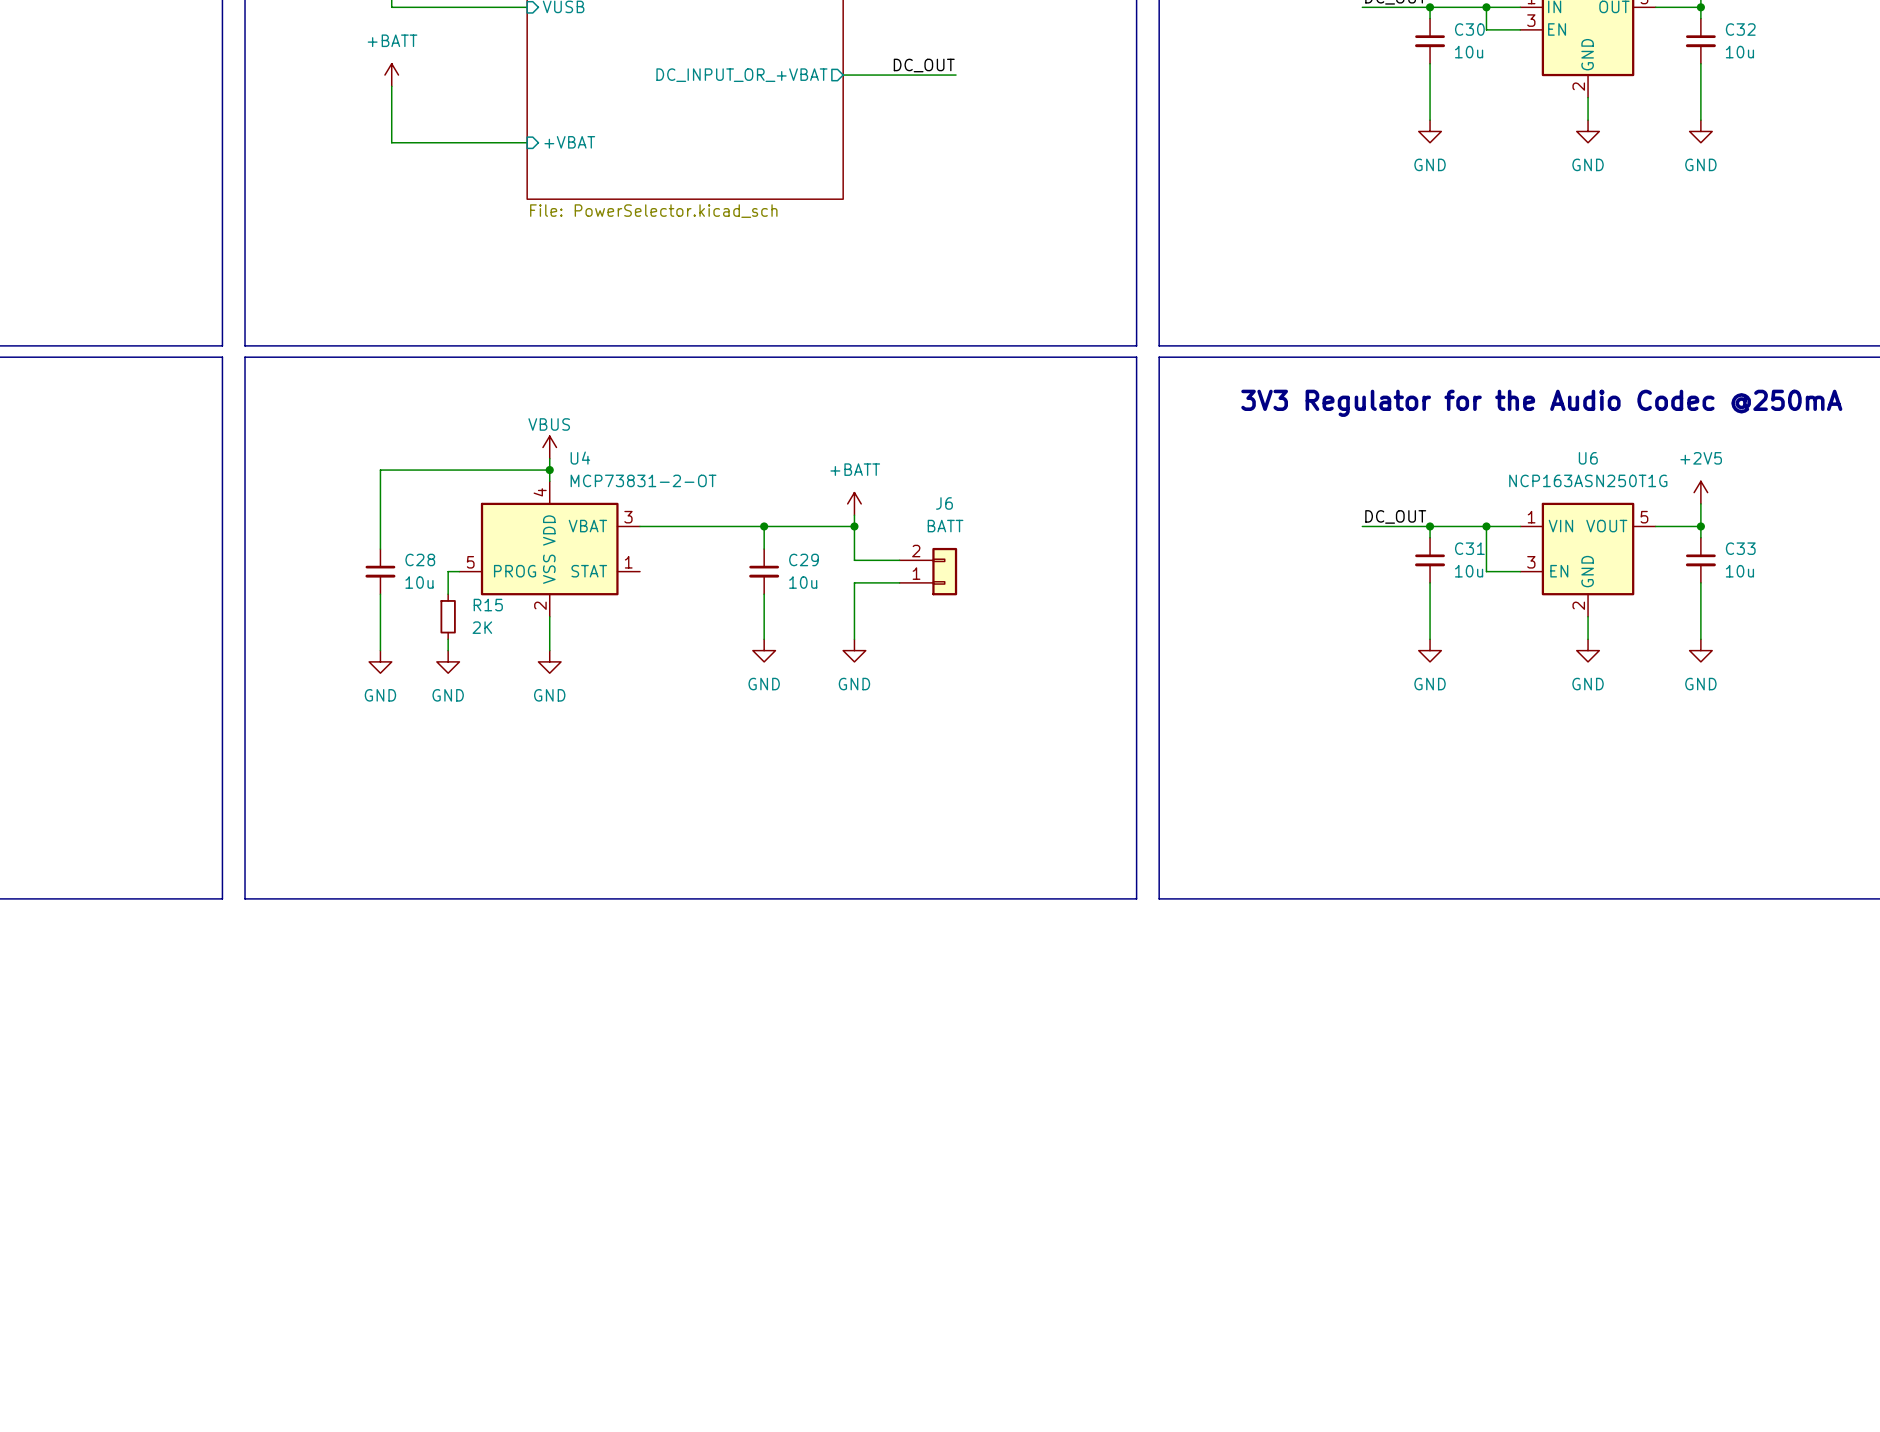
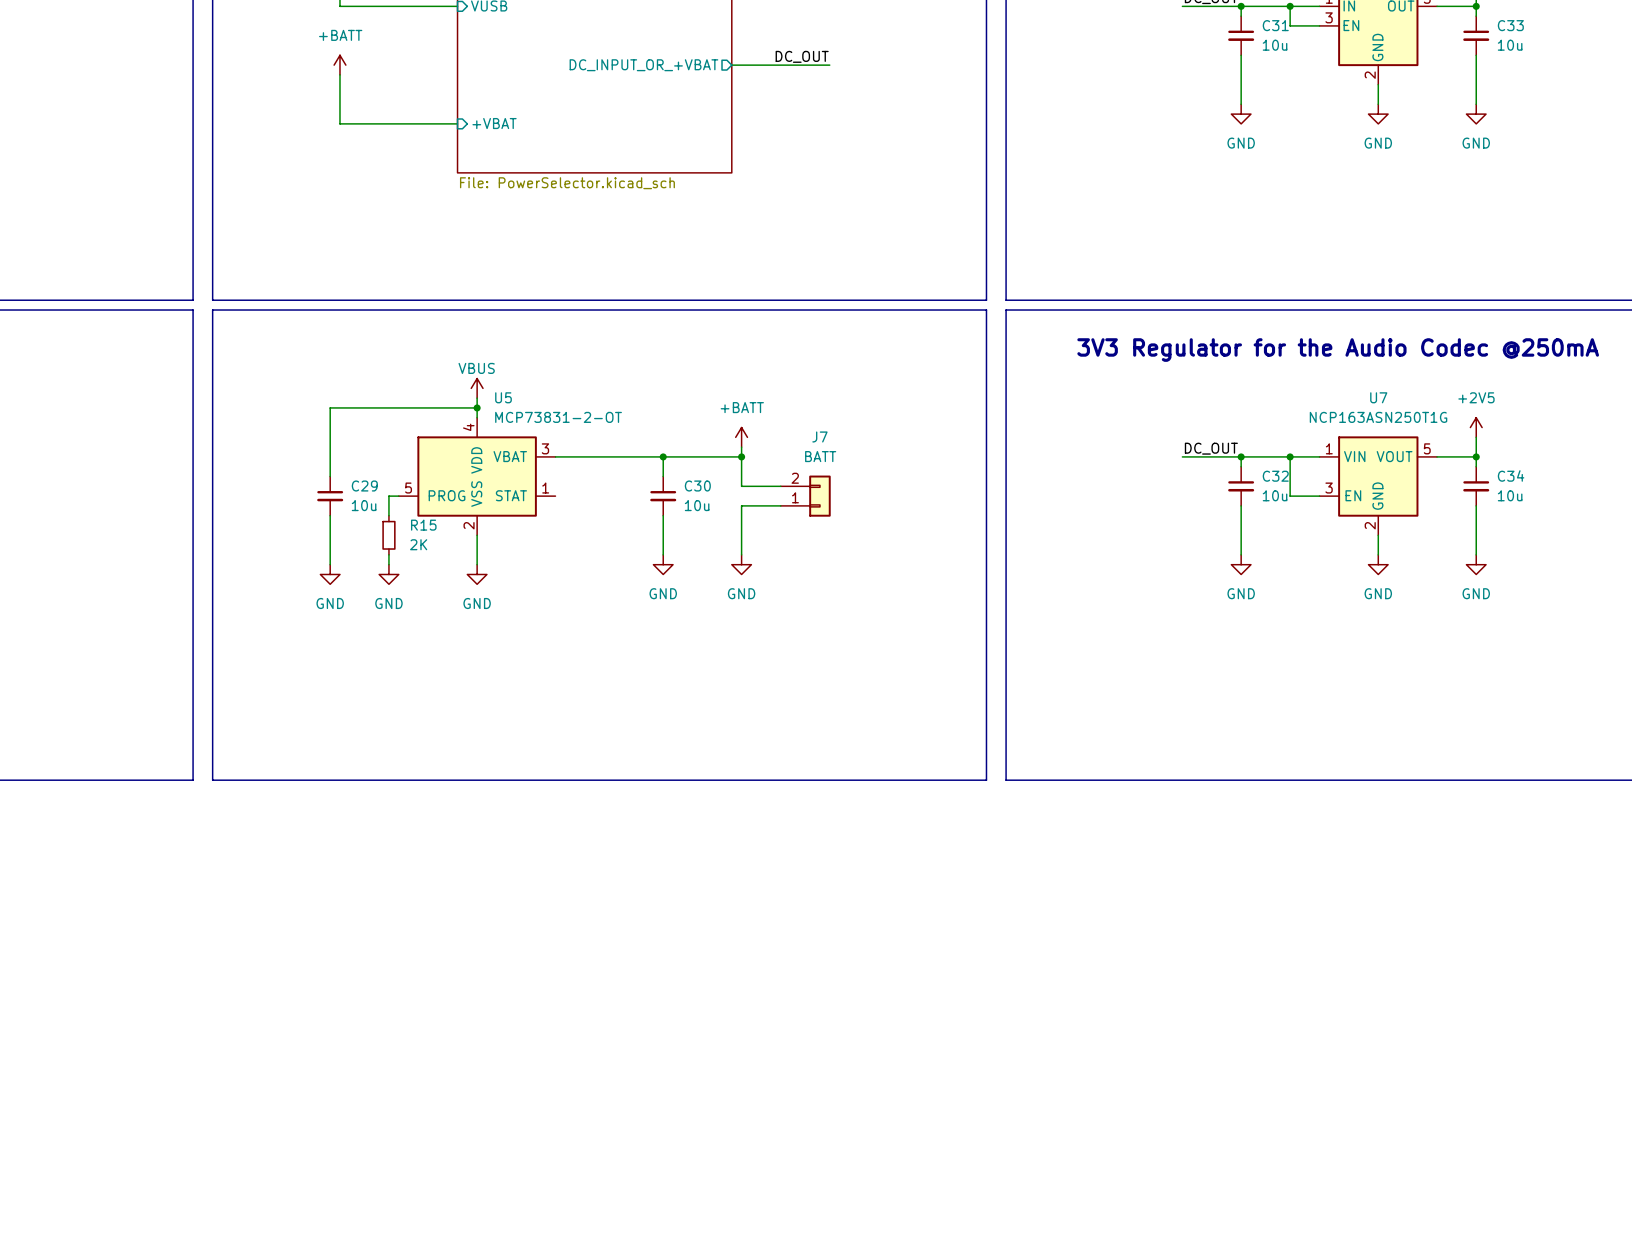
C30 name: C30 (1469, 29) -> C31 (1275, 25)
C32 name: C32 (1740, 29) -> C33 (1510, 25)
U4 name: U4 (580, 458) -> U5 (503, 397)
U6 name: U6 (1588, 458) -> U7 (1378, 397)
J6 name: J6 (944, 503) -> J7 (819, 436)
C31 name: C31 (1469, 548) -> C32 (1275, 476)
C33 name: C33 (1740, 548) -> C34 (1511, 475)
C28 name: C28 (420, 559) -> C29 (364, 486)
C29 name: C29 (804, 559) -> C30 (697, 486)

